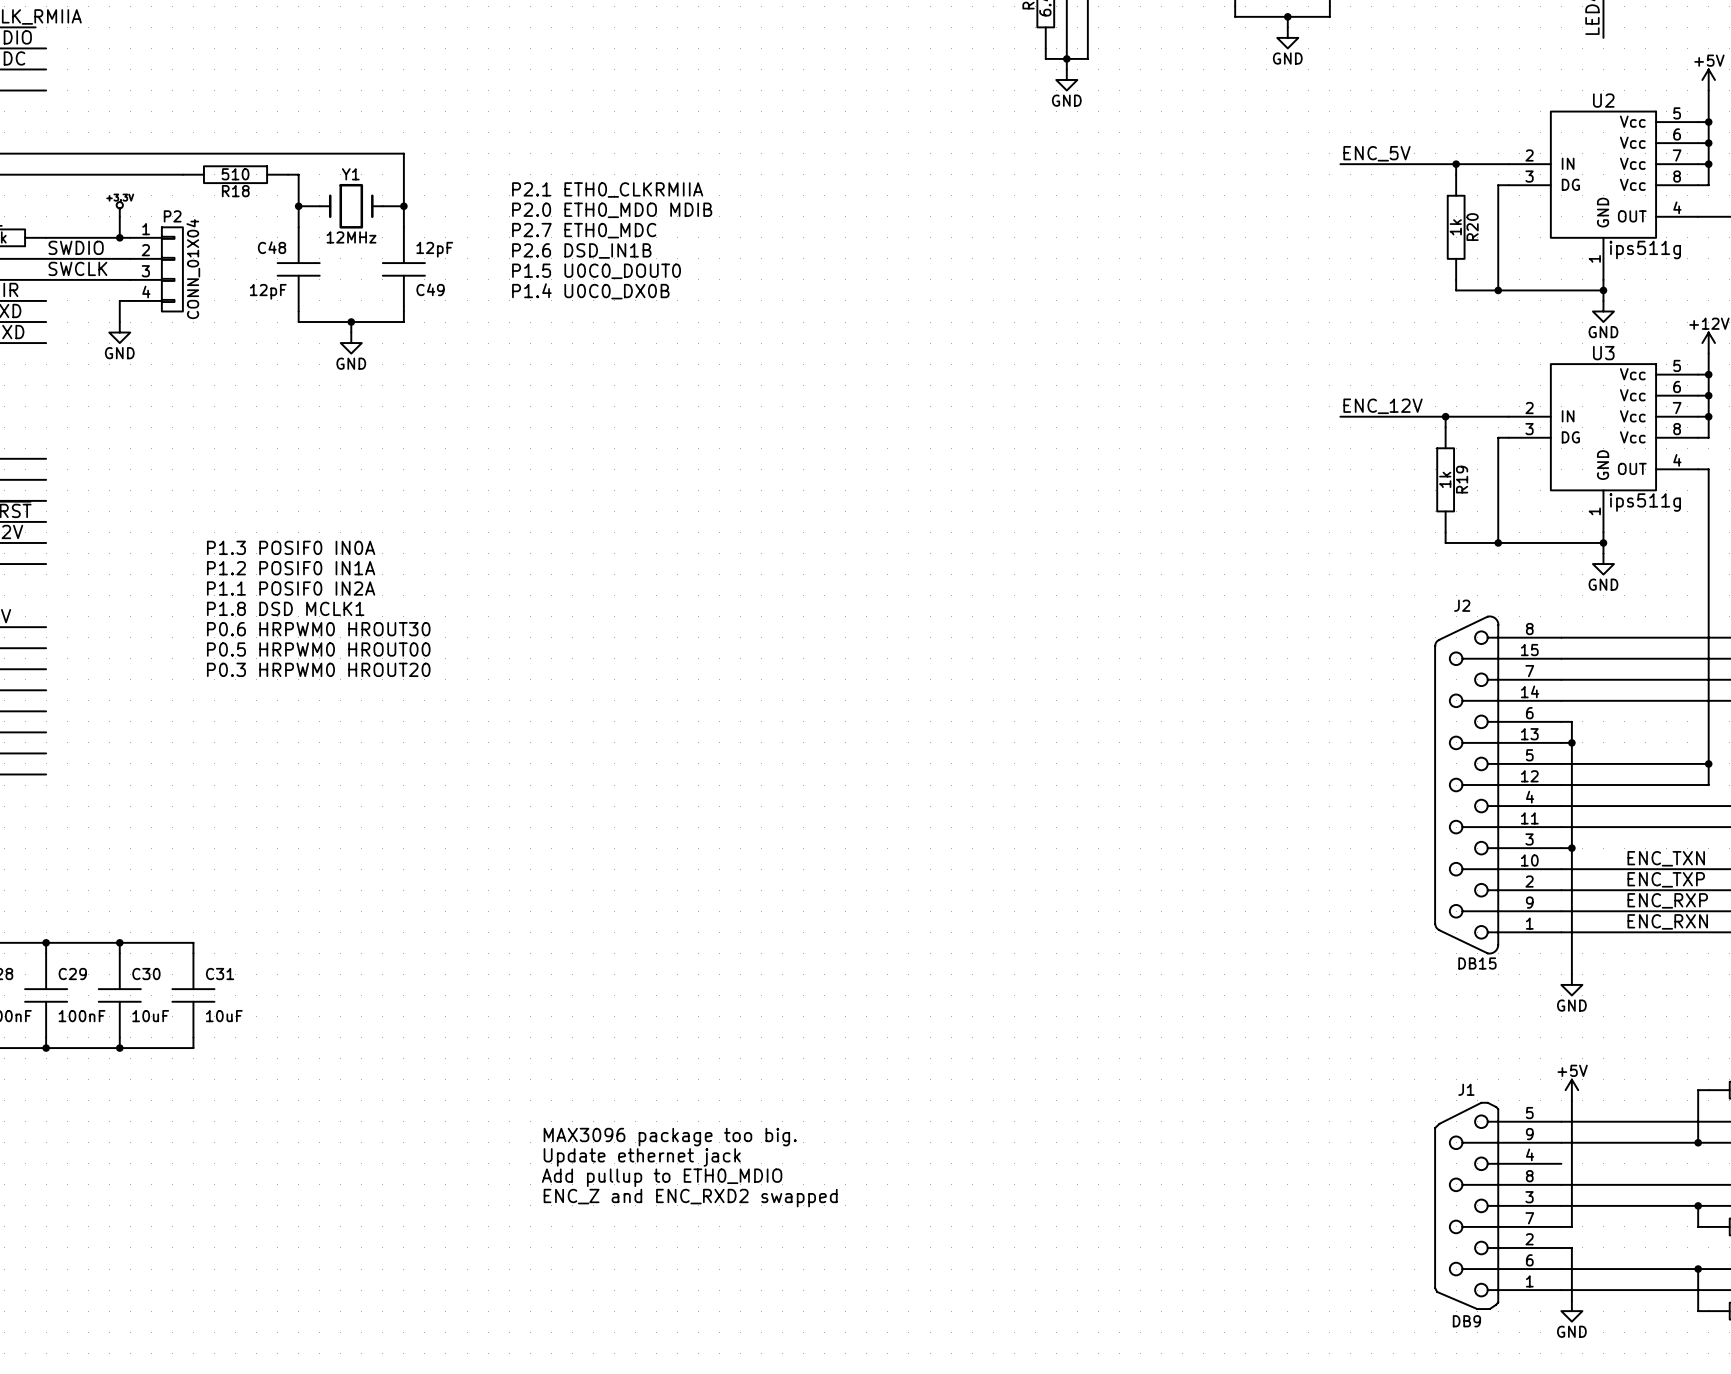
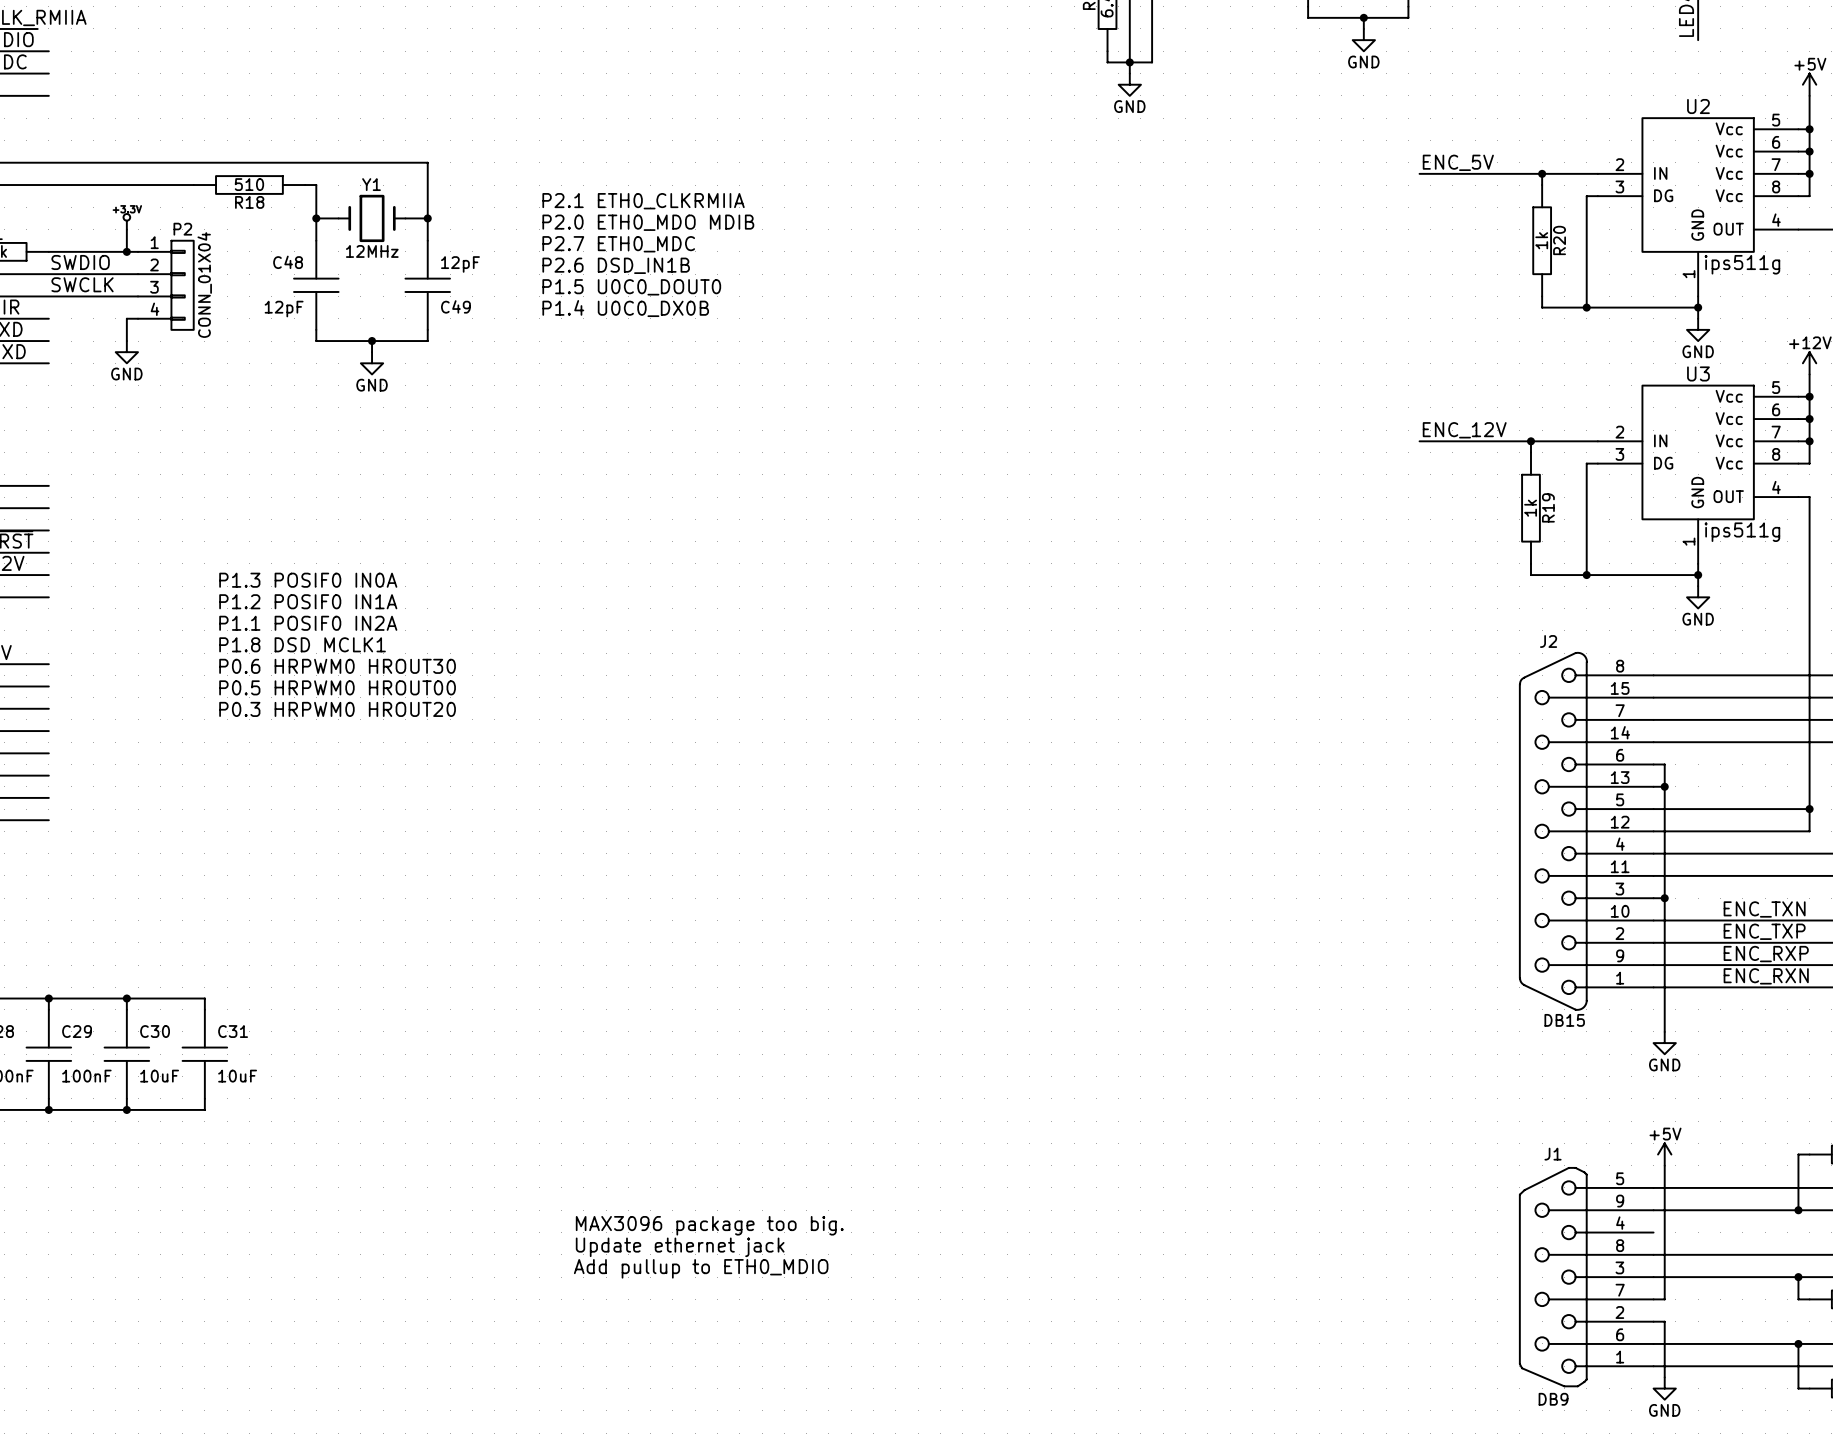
text: MAX3096 package too big. (670, 1137) -> none
text: Update ethernet jack (642, 1157) -> MAX3096 package too big. (709, 1225)
text: Add pullup to ETH0_MDIO (662, 1177) -> Update ethernet jack (680, 1247)
text: ENC_Z and ENC_RXD2 swapped (690, 1198) -> Add pullup to ETH0_MDIO (701, 1268)

